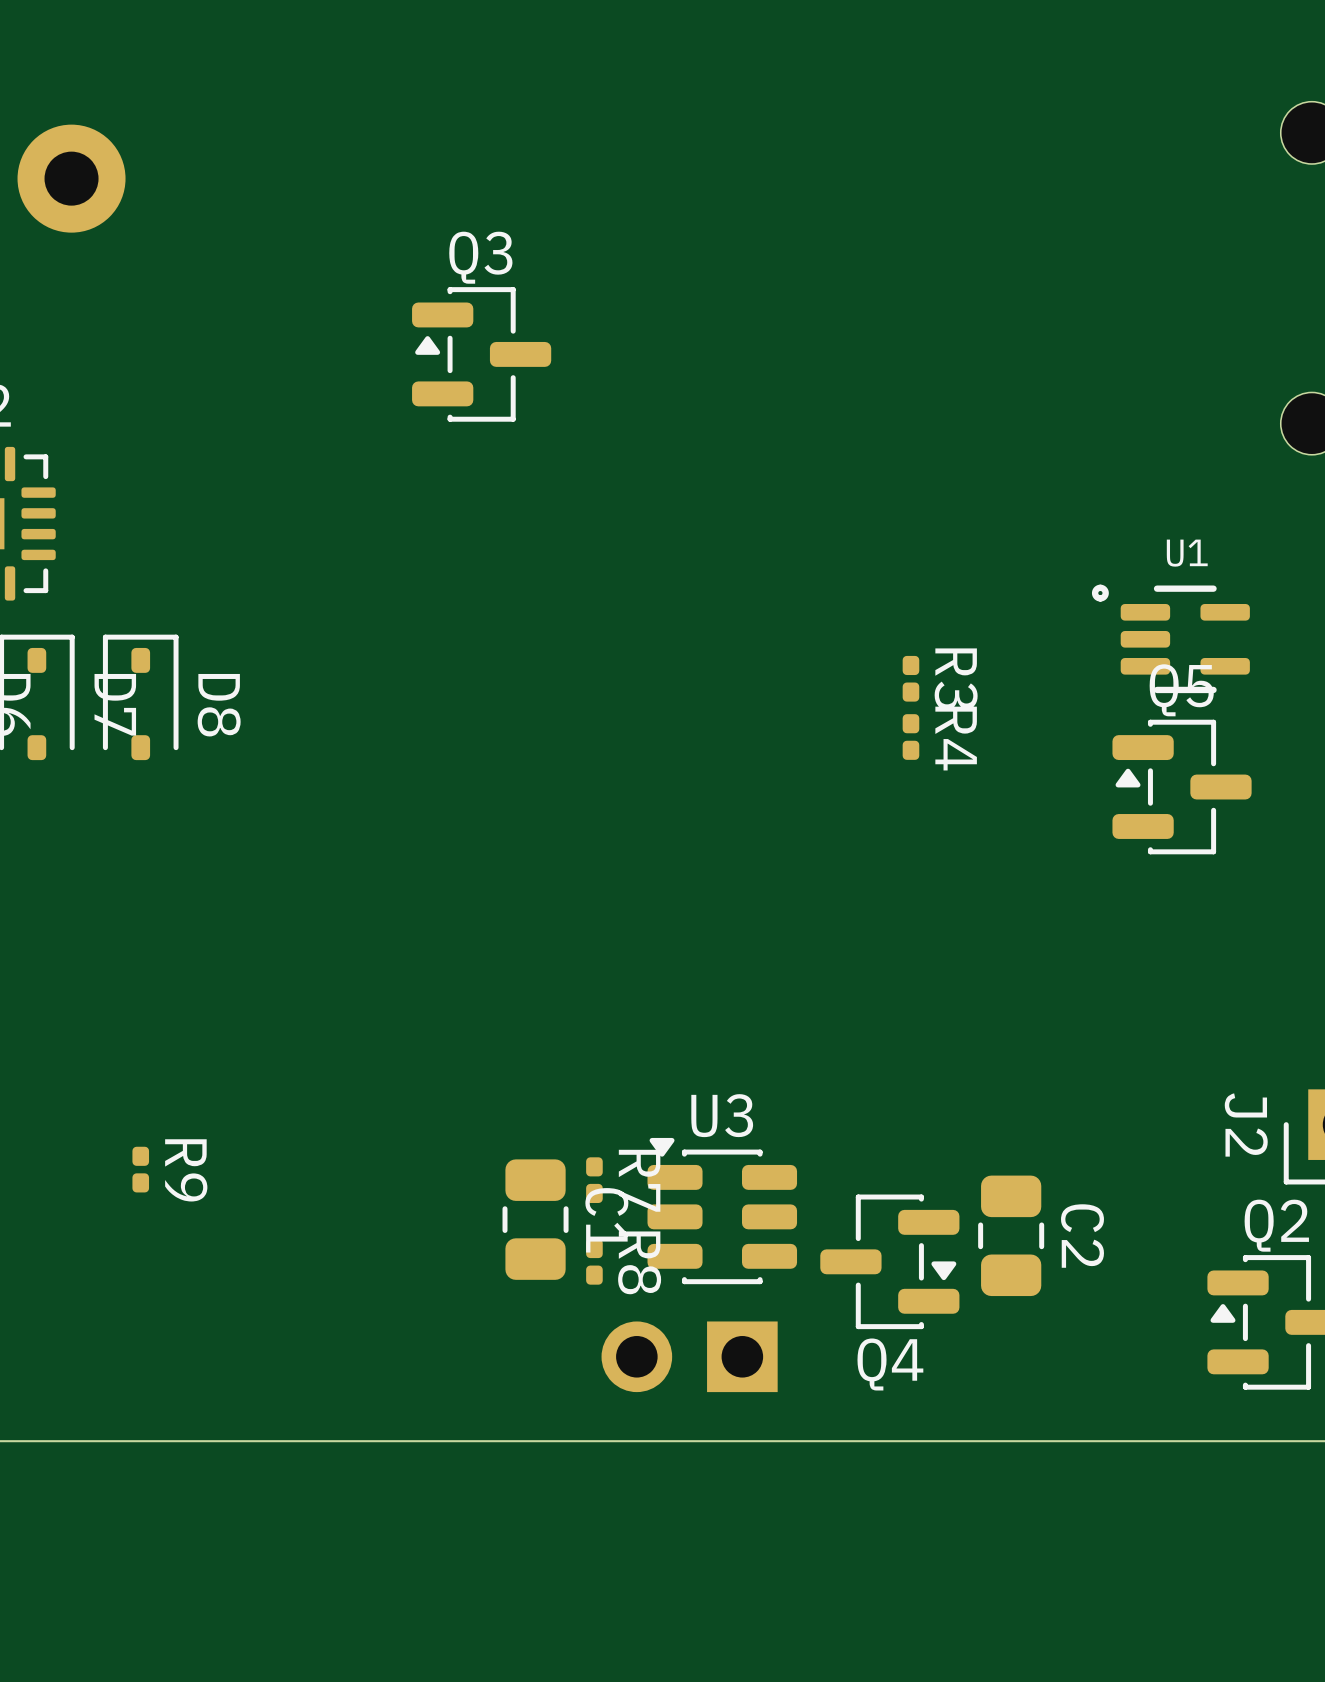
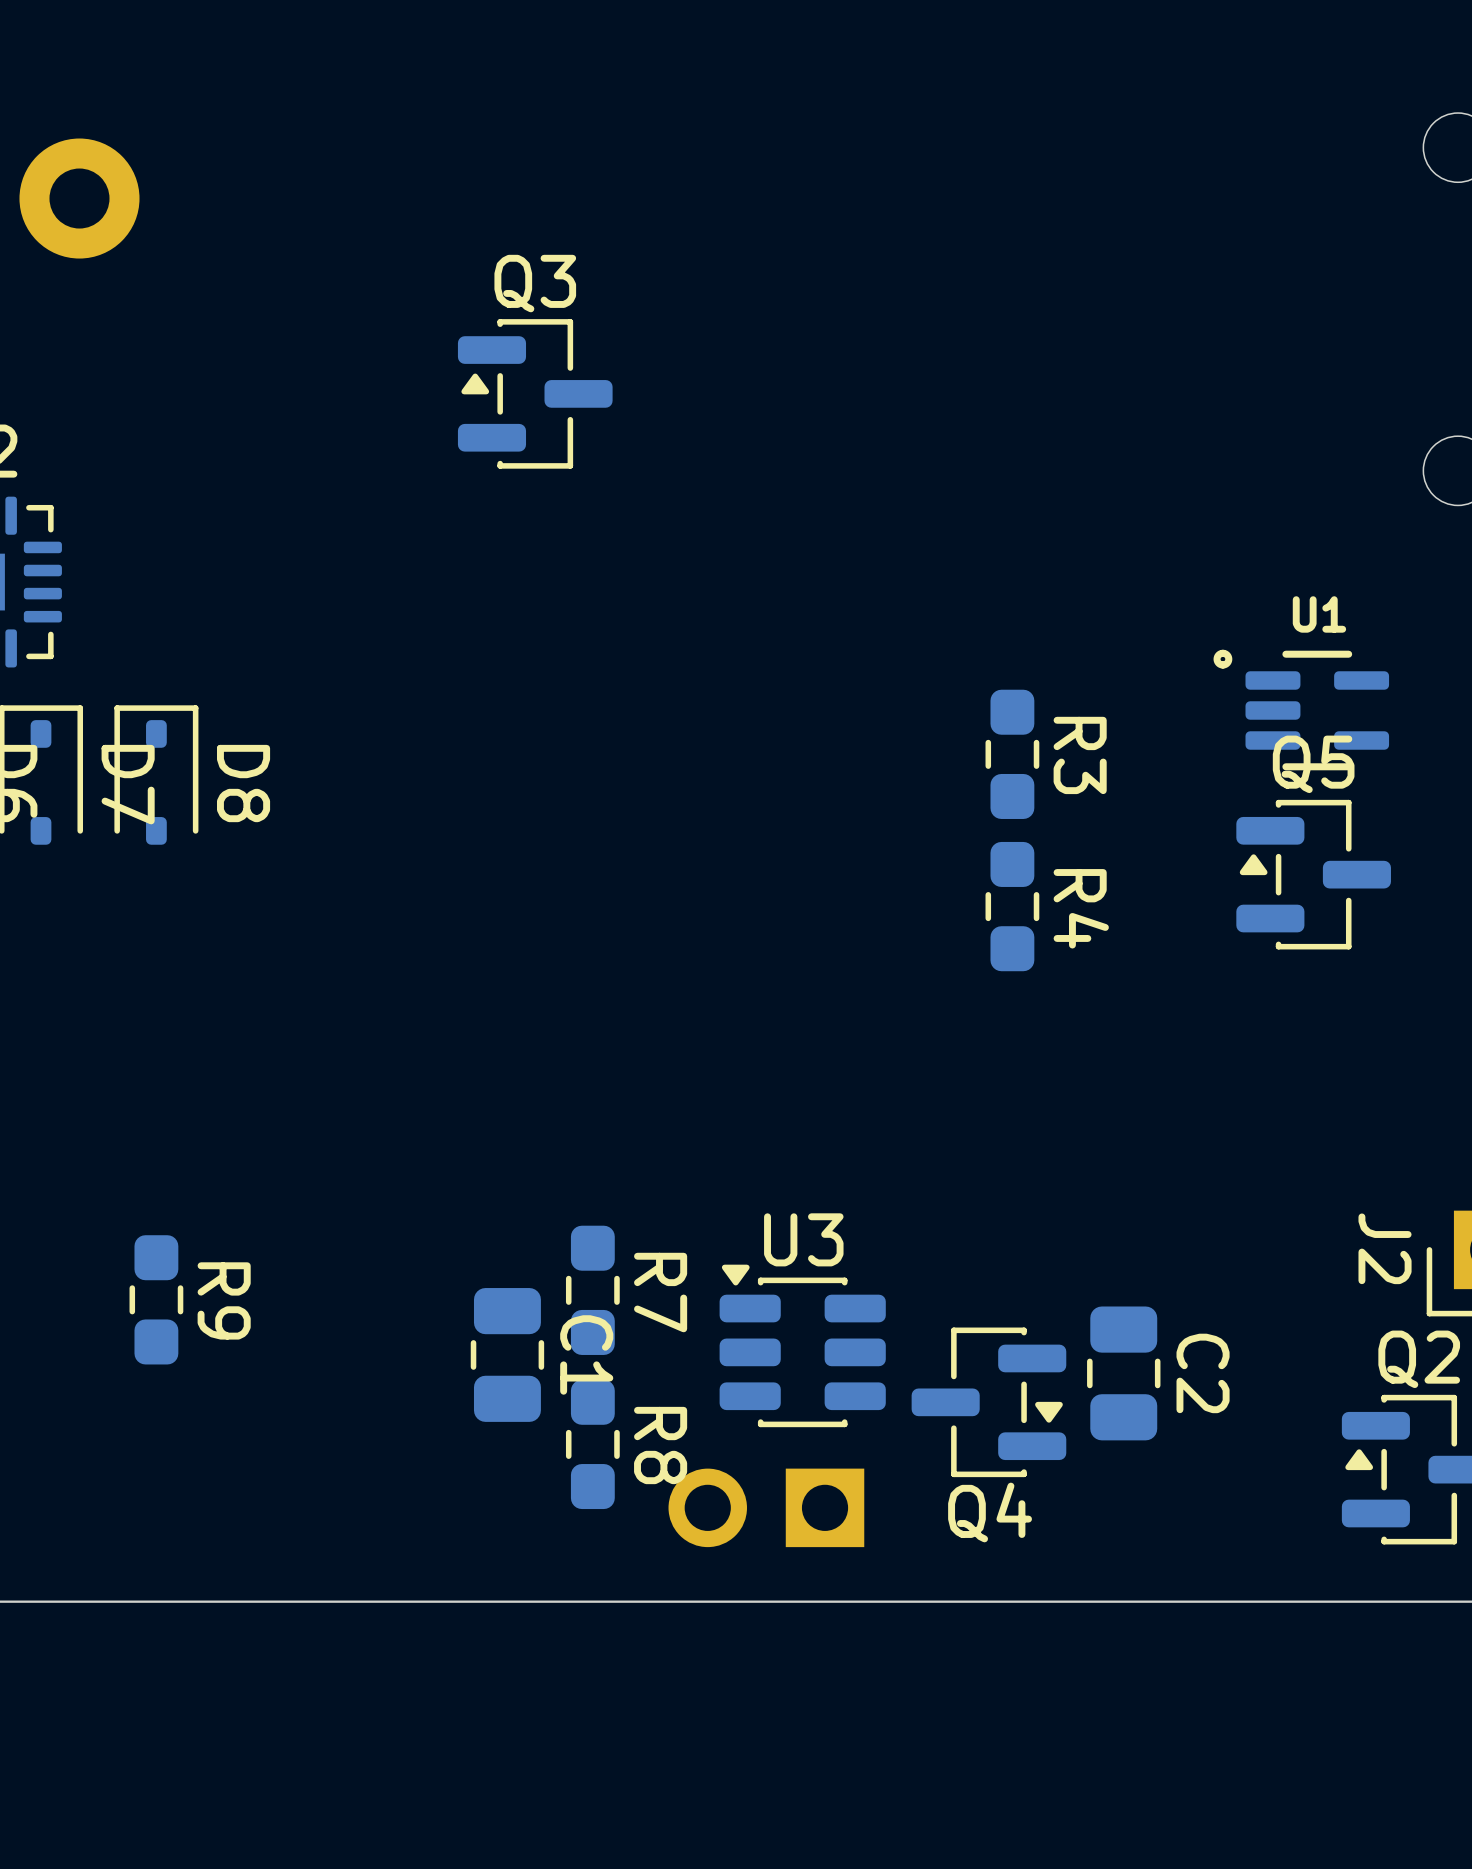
R3 footprint: [902, 655, 920, 702] -> [985, 689, 1040, 819]
R4 footprint: [902, 714, 920, 760] -> [985, 841, 1040, 972]
R9 footprint: [132, 1146, 150, 1193] -> [129, 1235, 184, 1365]
R7 footprint: [586, 1157, 603, 1204] -> [565, 1225, 620, 1355]
C1 position: (535, 1219) -> (507, 1354)
R8 footprint: [586, 1238, 603, 1285] -> [565, 1379, 620, 1510]

